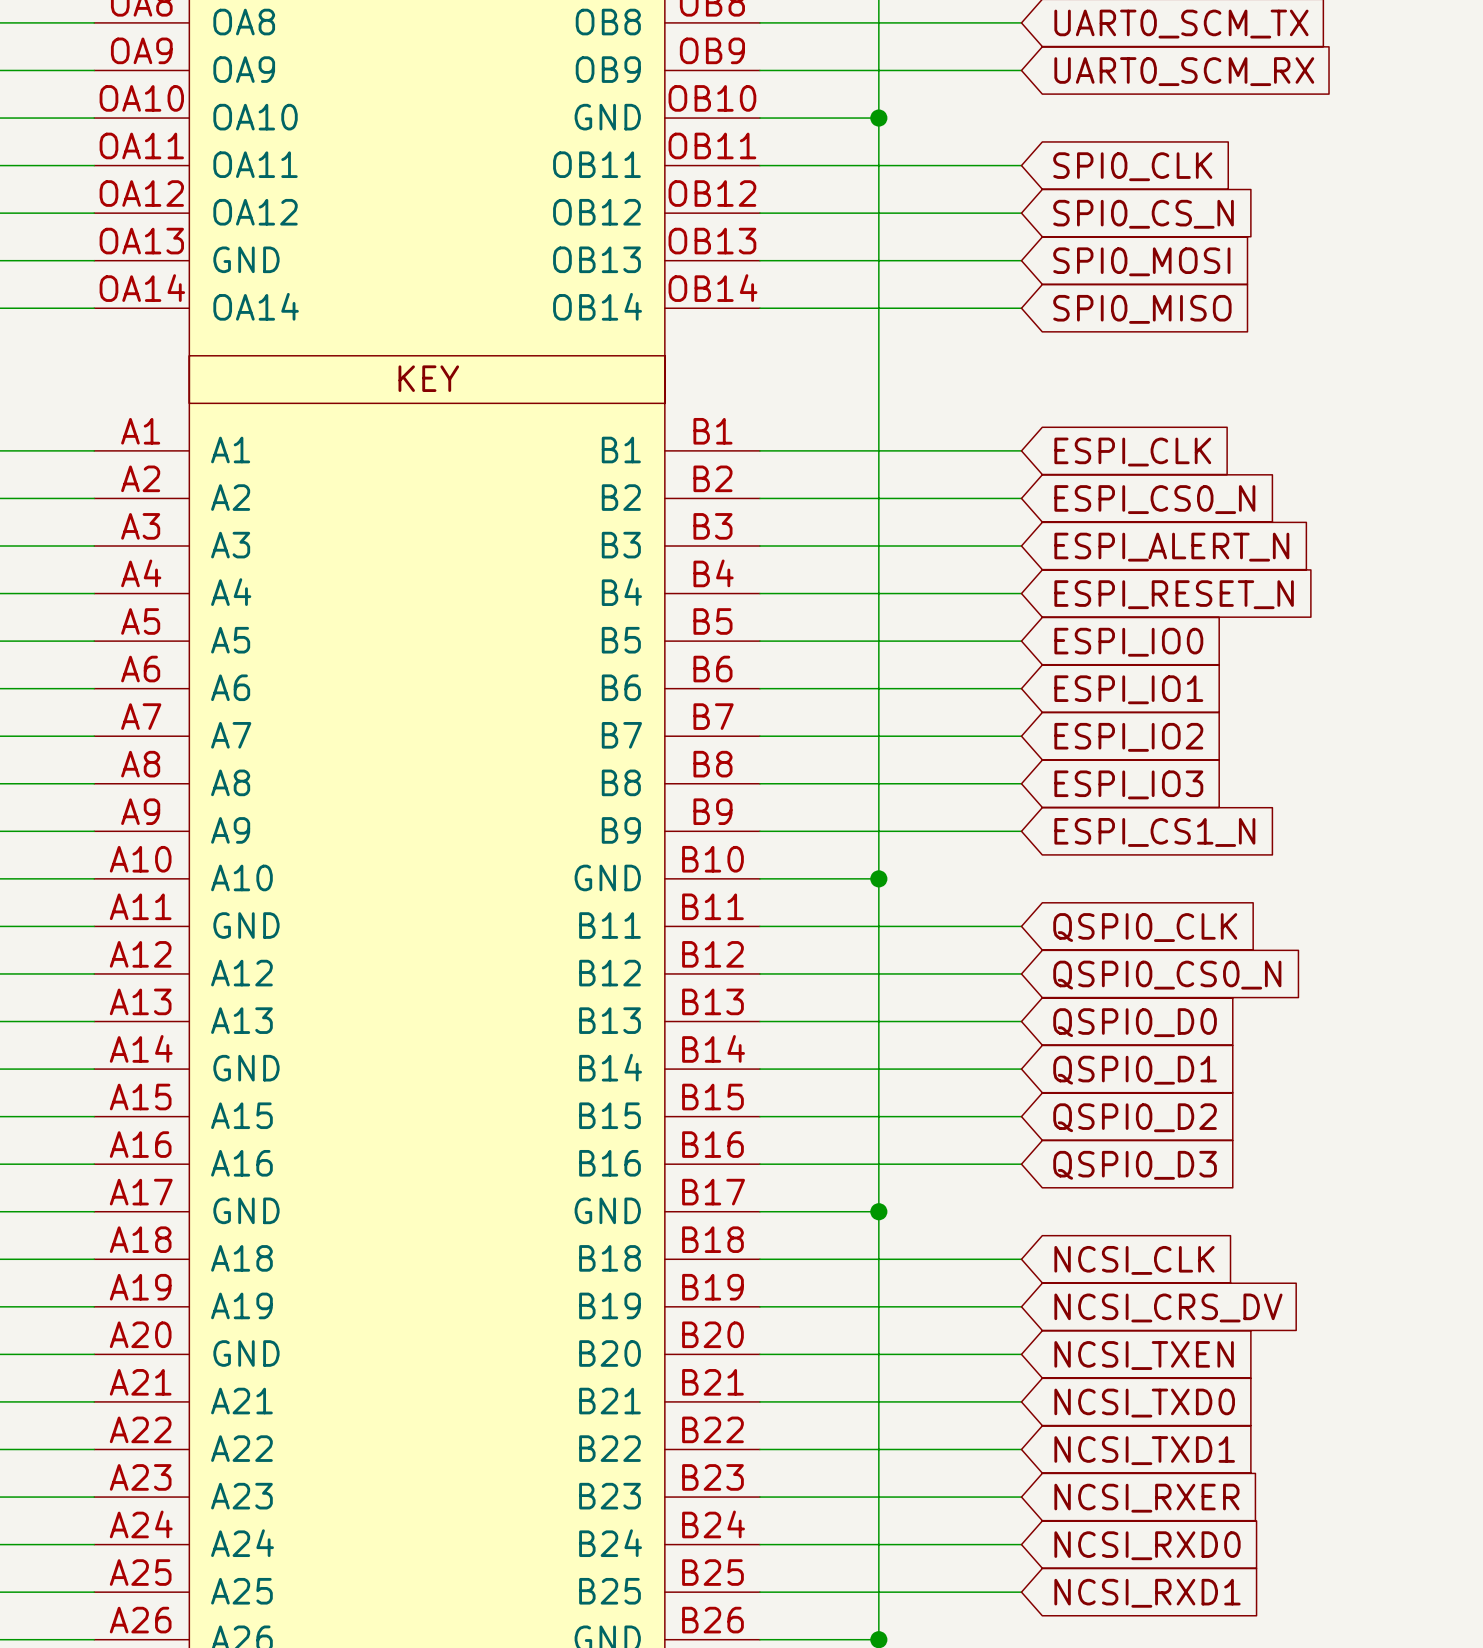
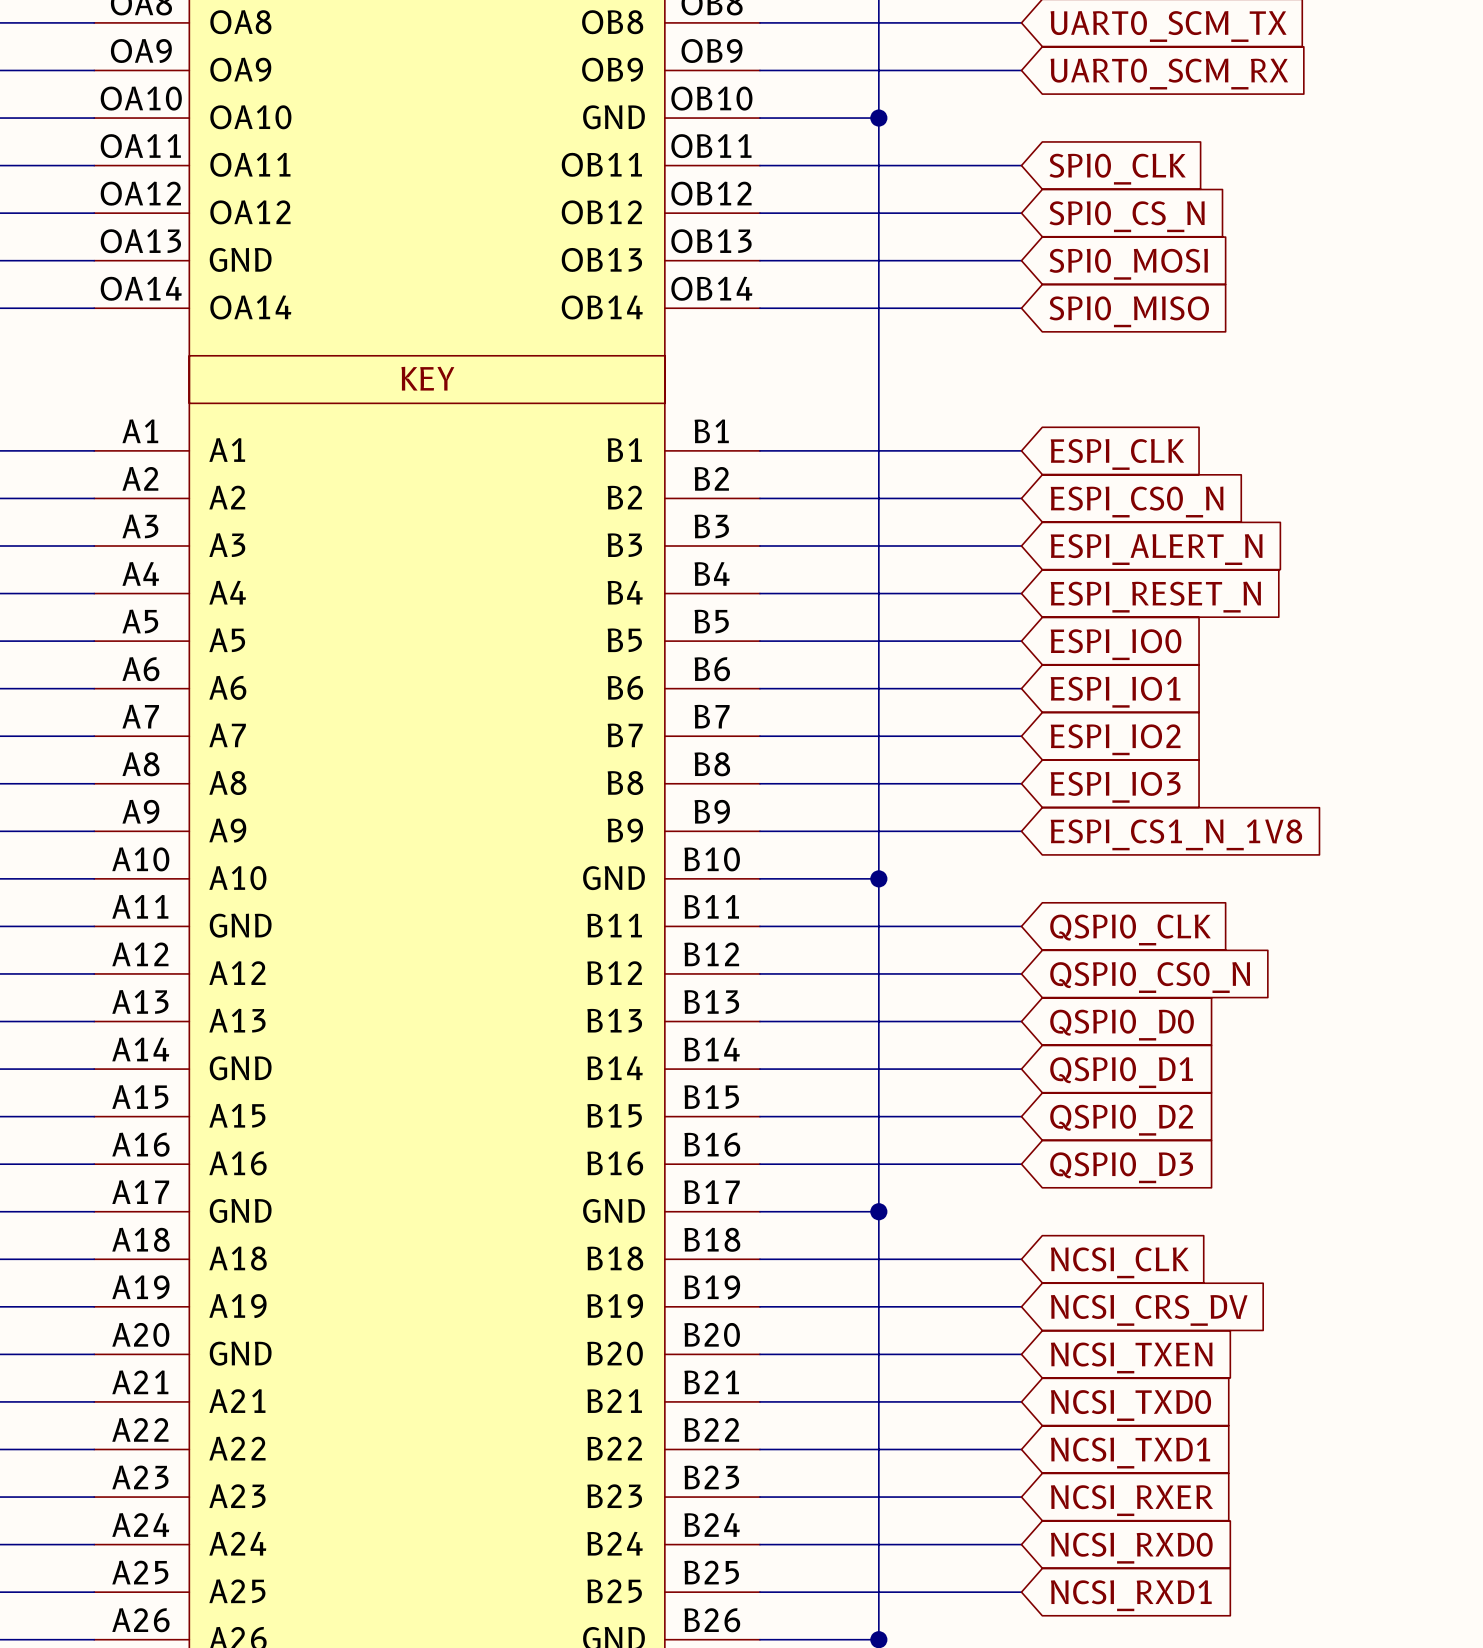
global label: ESPI_CS1_N (1154, 832) -> ESPI_CS1_N_1V8 (1176, 834)

